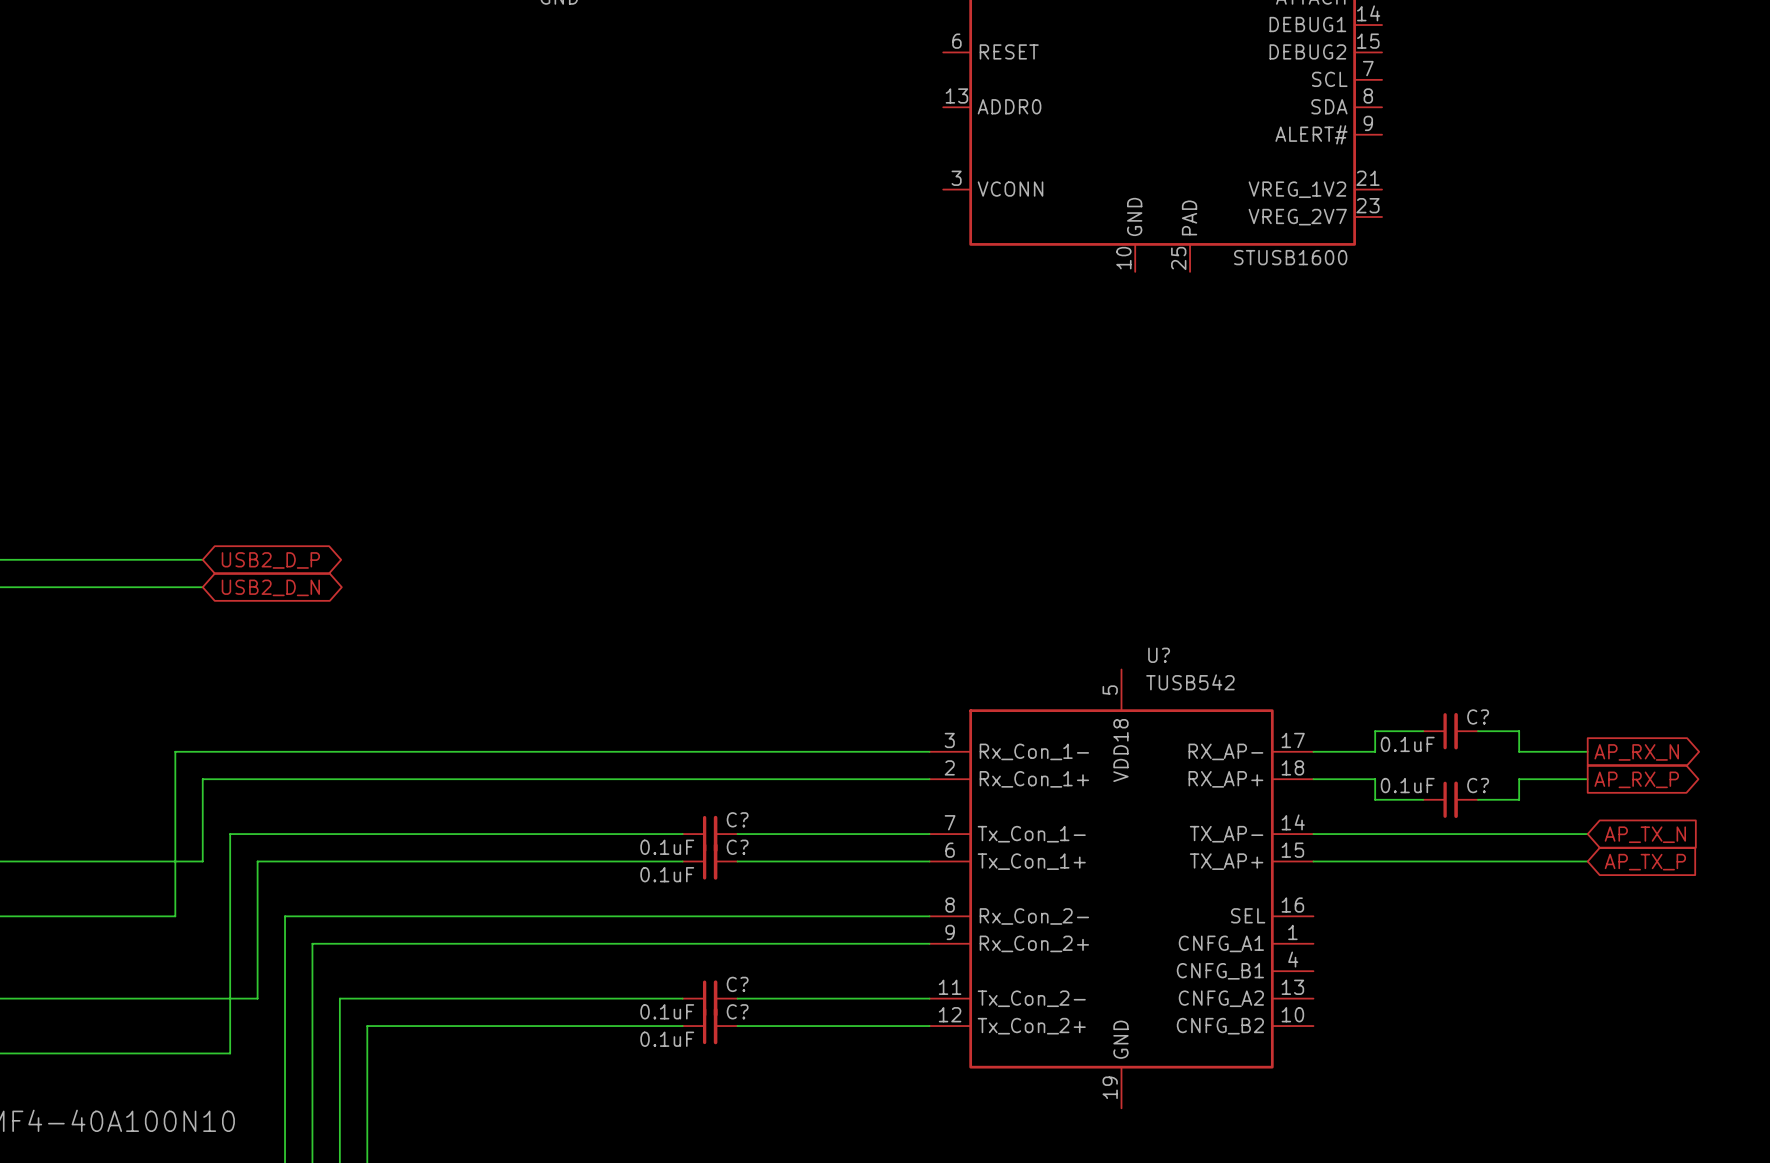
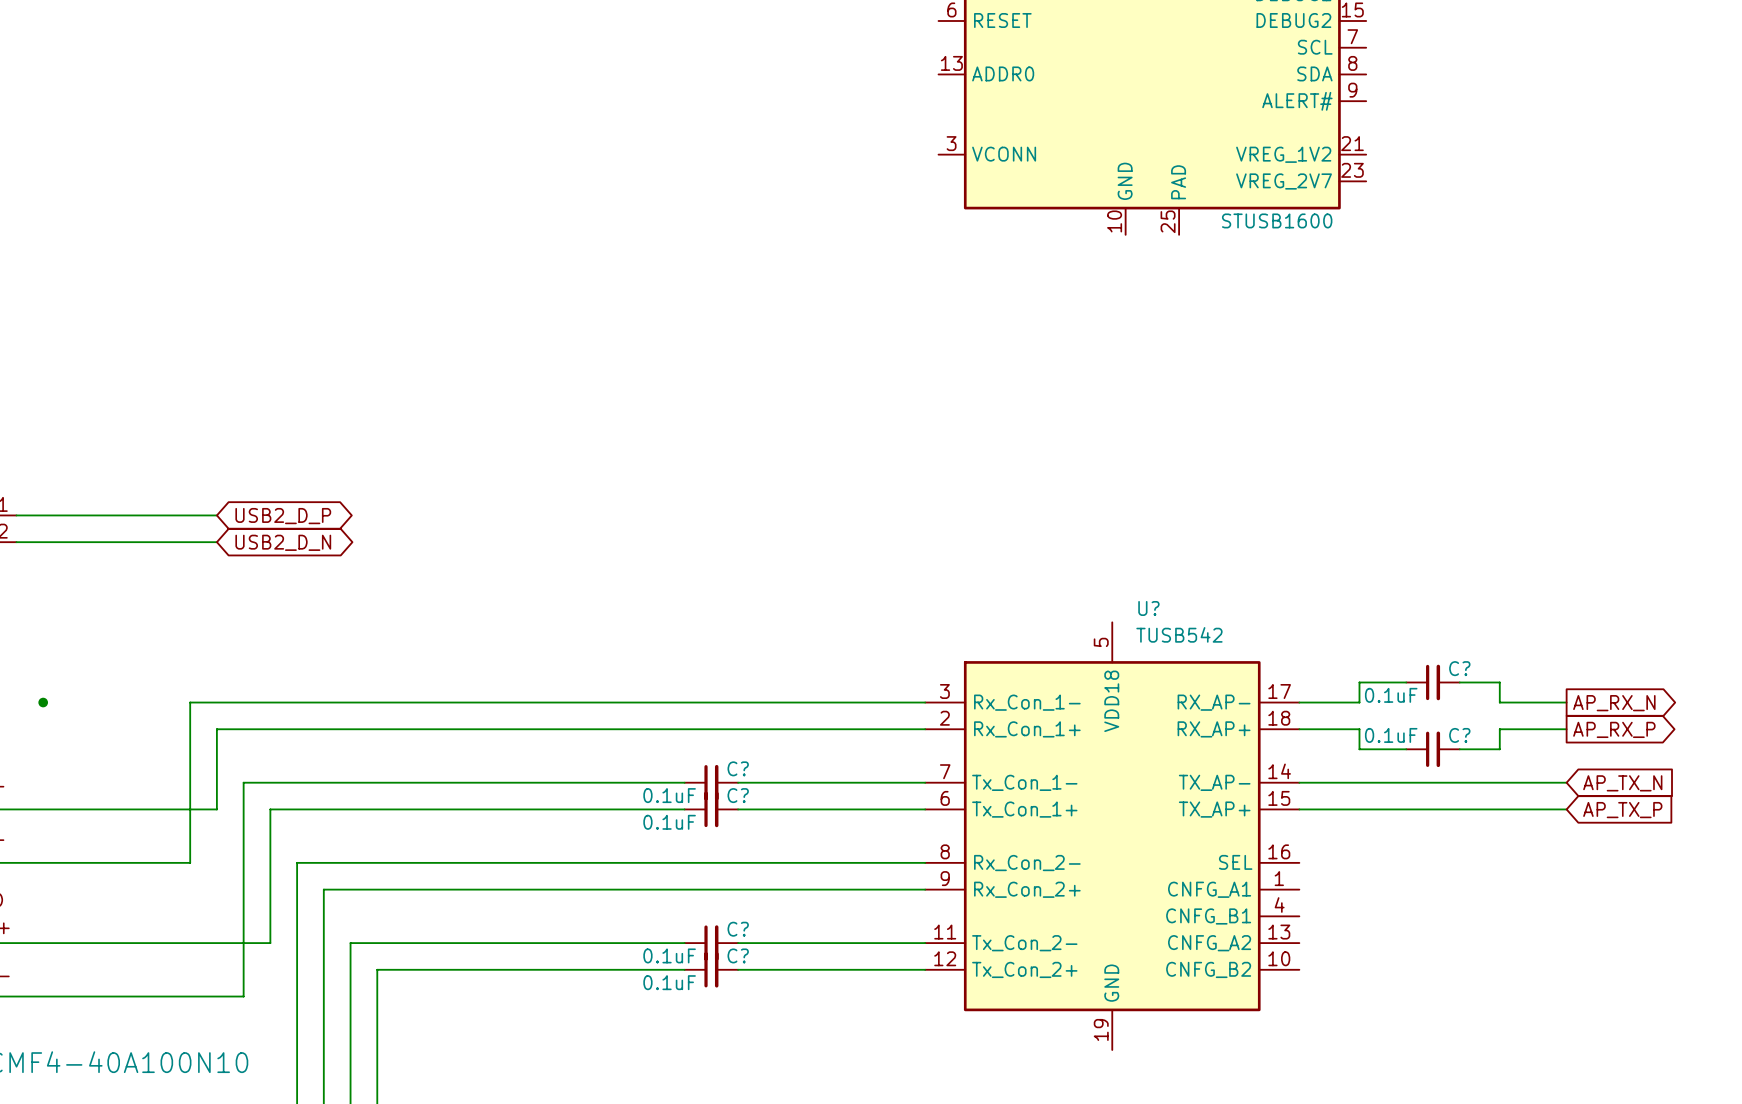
junction: none -> (43, 702)

